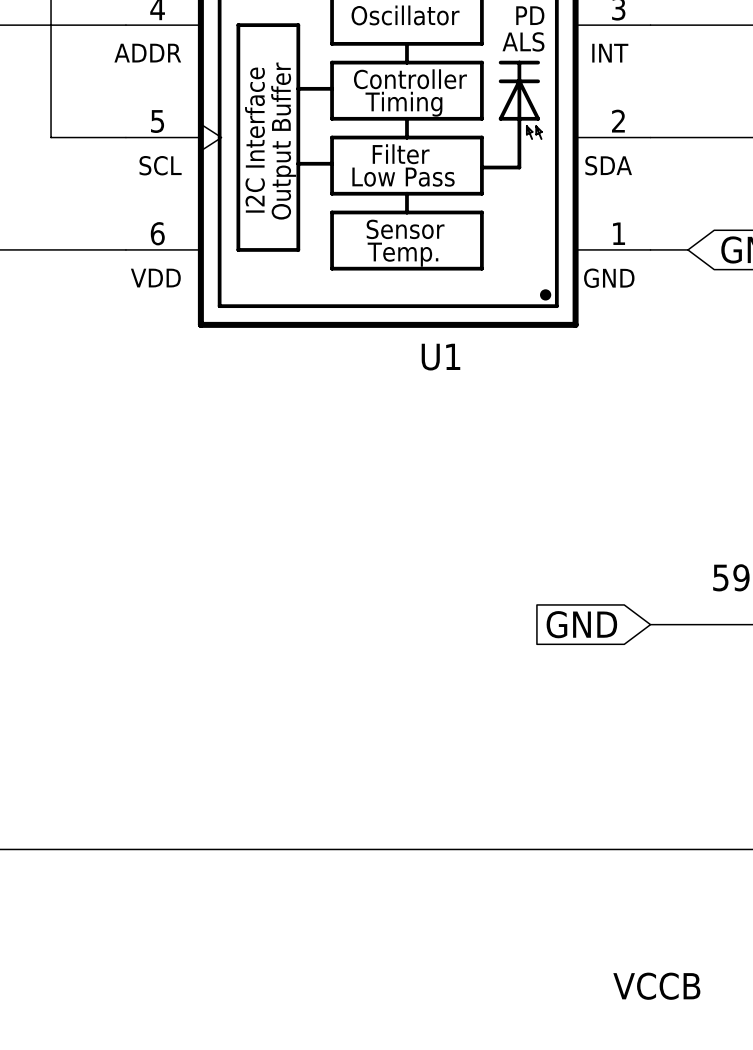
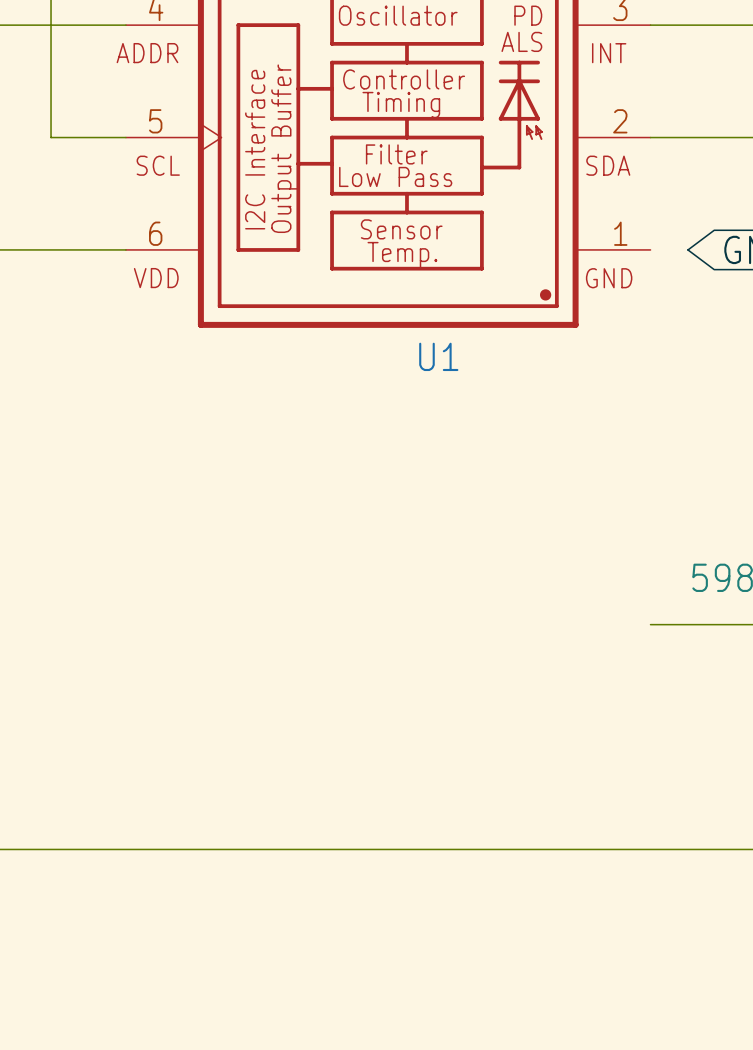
wire: (650, 249) (688, 249) -> none
global label: GND (581, 624) -> none
label: VCCB (656, 986) -> none

